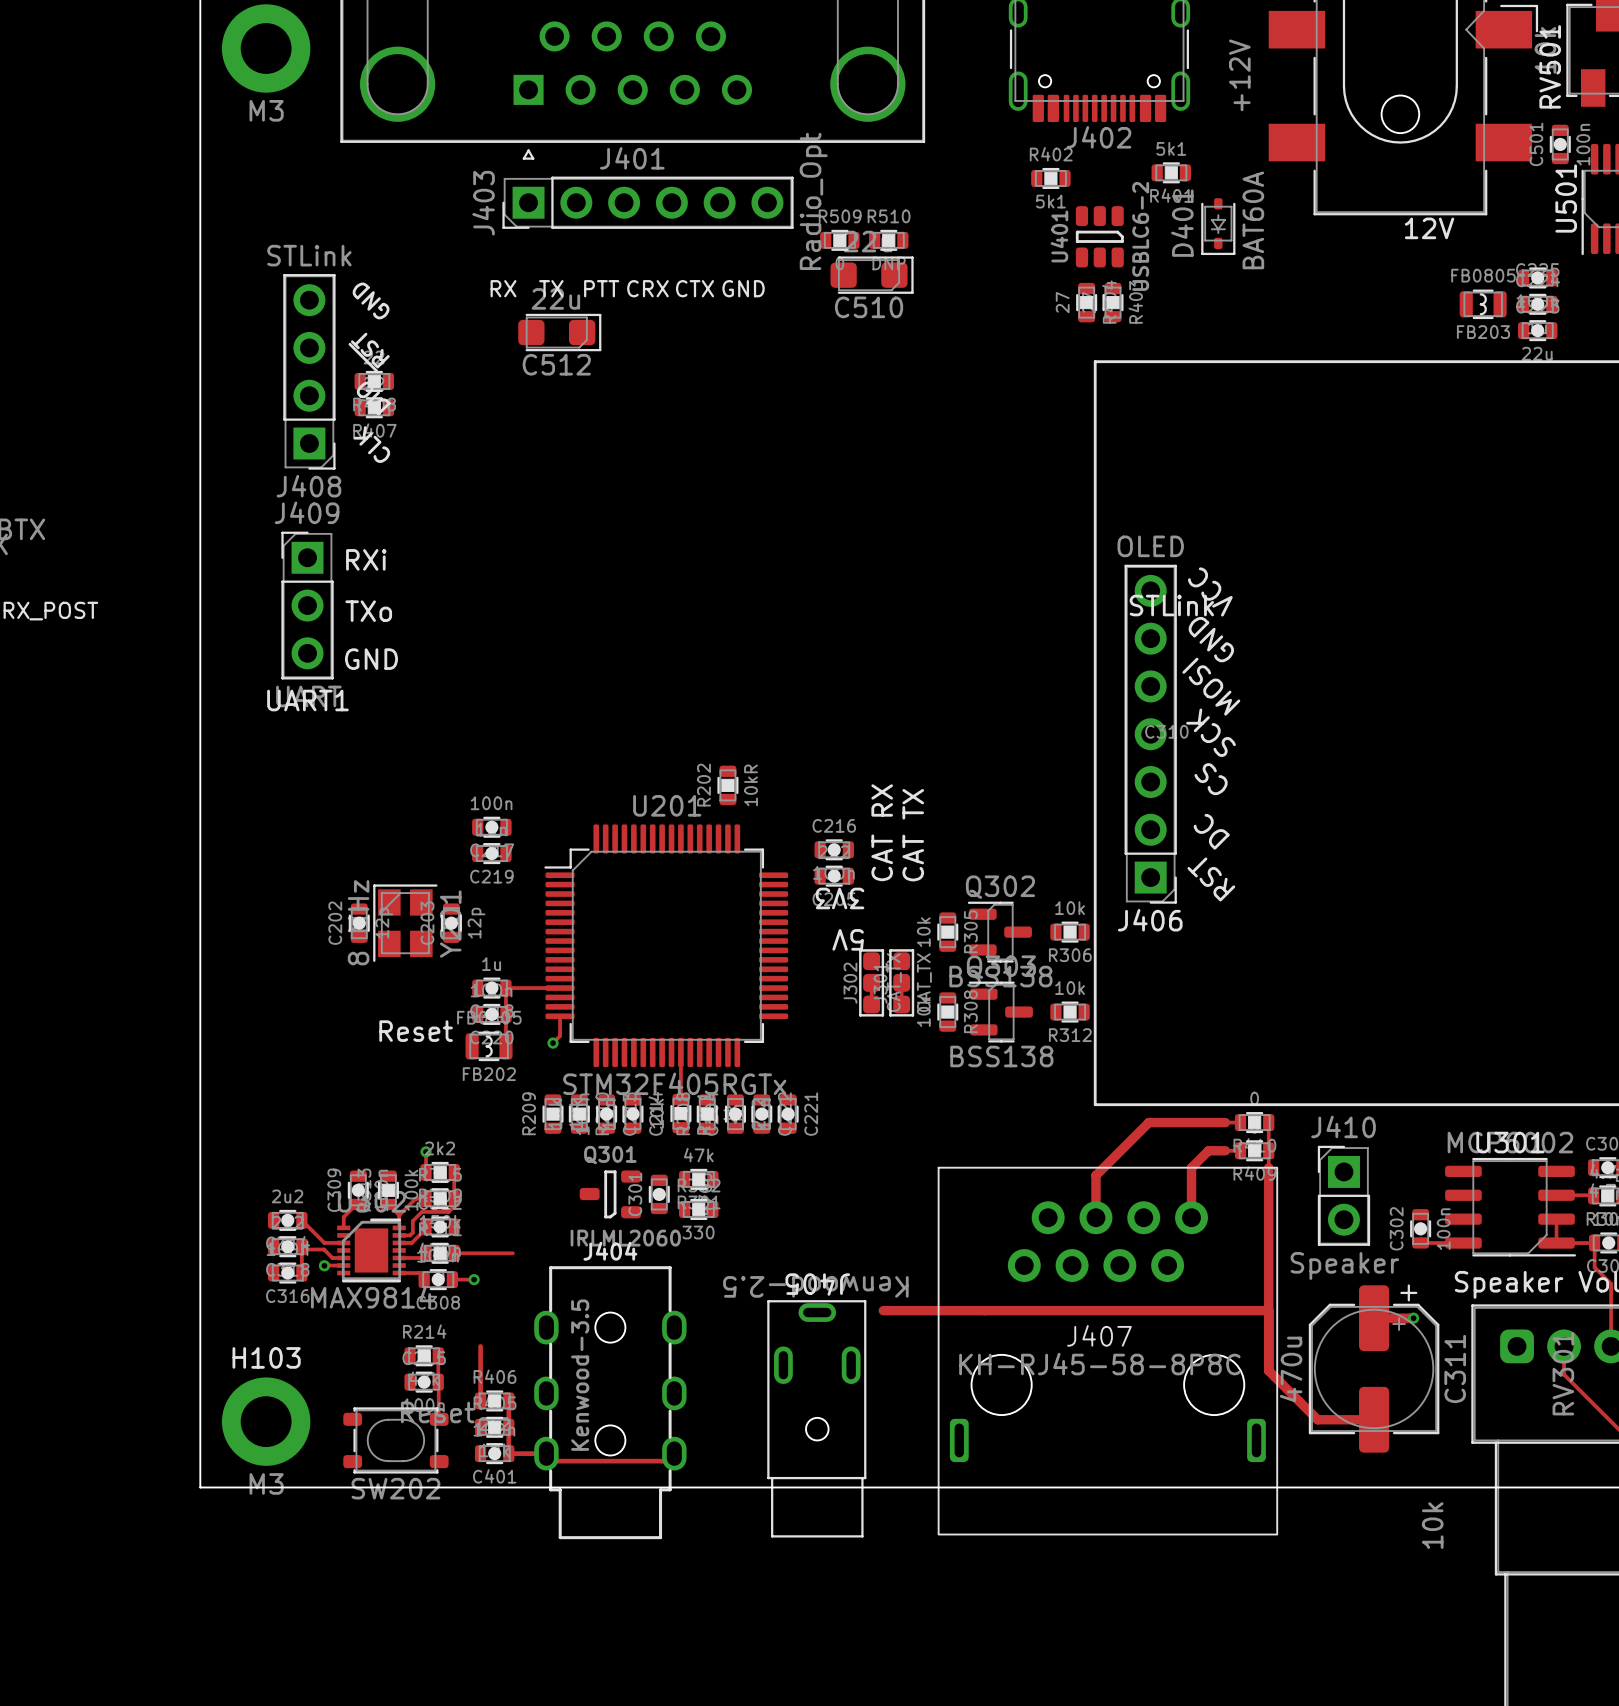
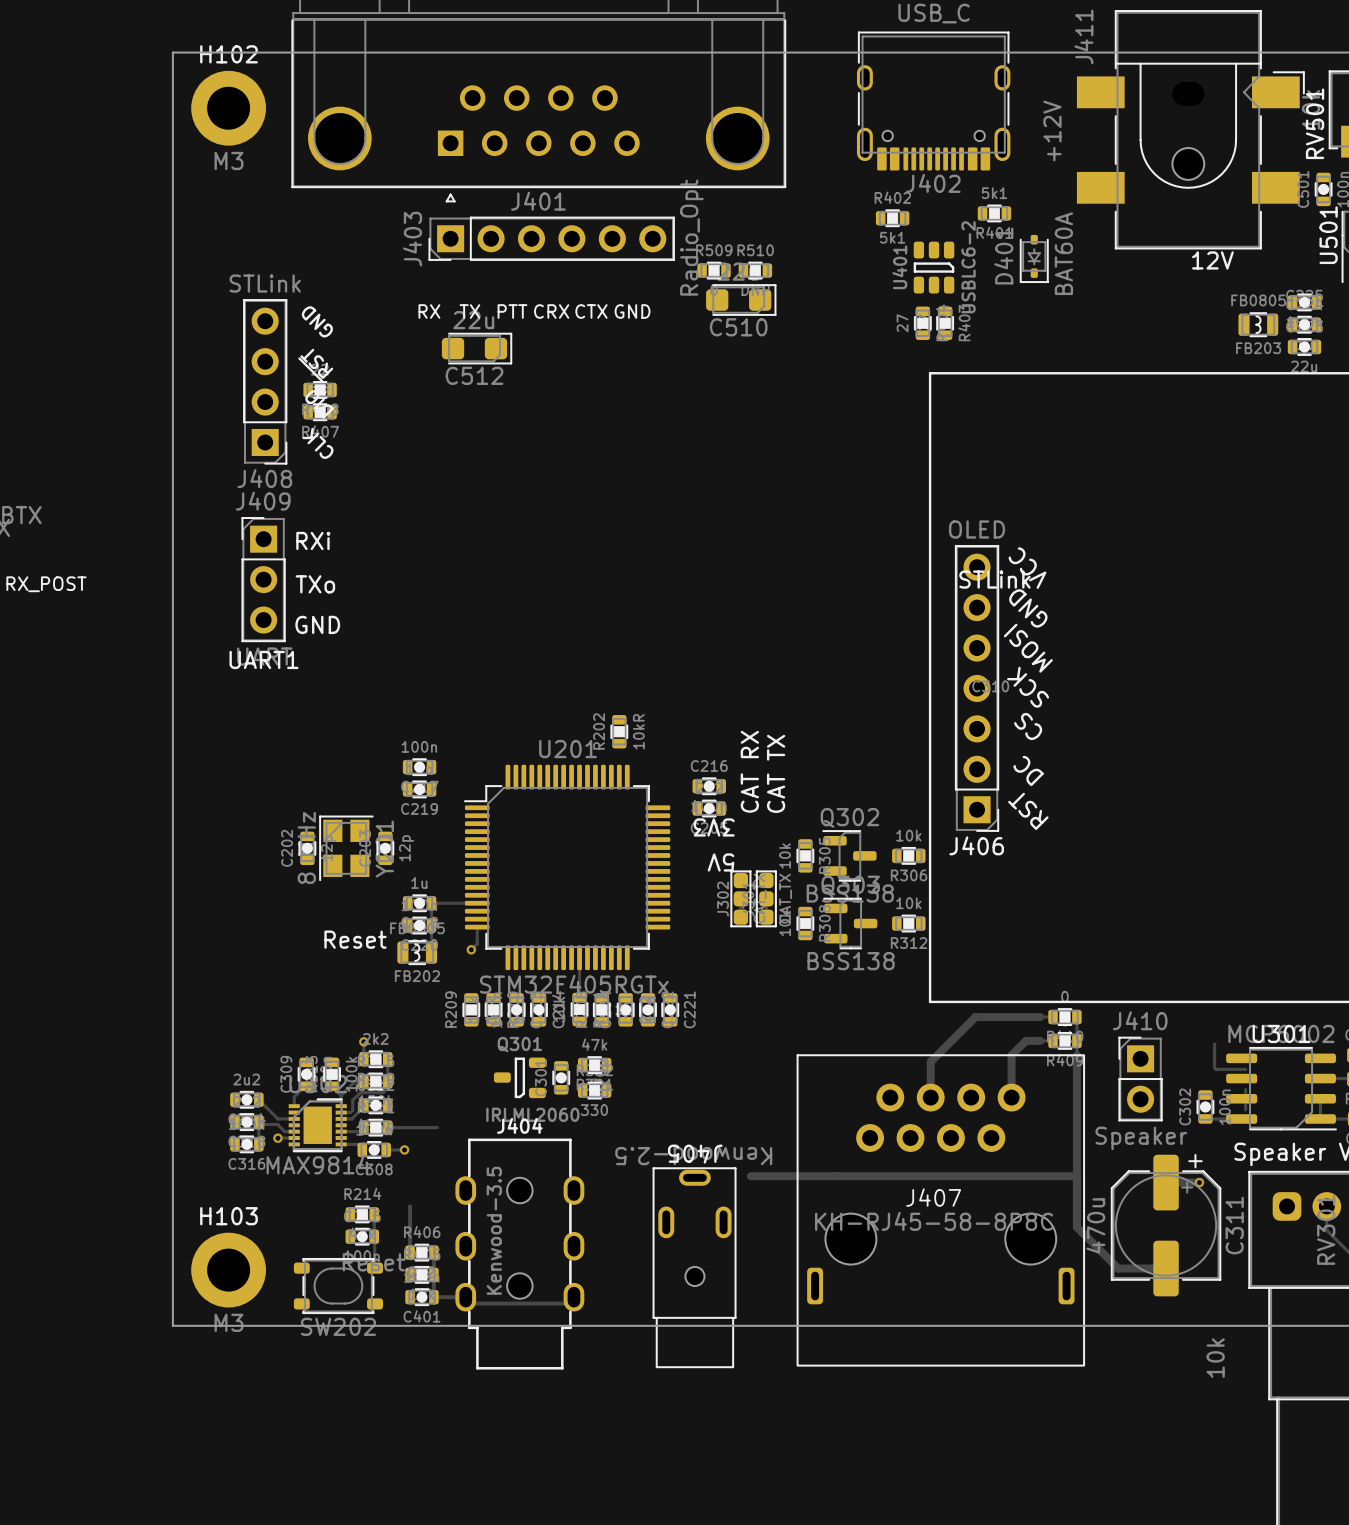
track: none -> (1214, 1044) (1216, 1069) (1245, 1069)
track: none -> (1245, 1089) (1245, 1109)

